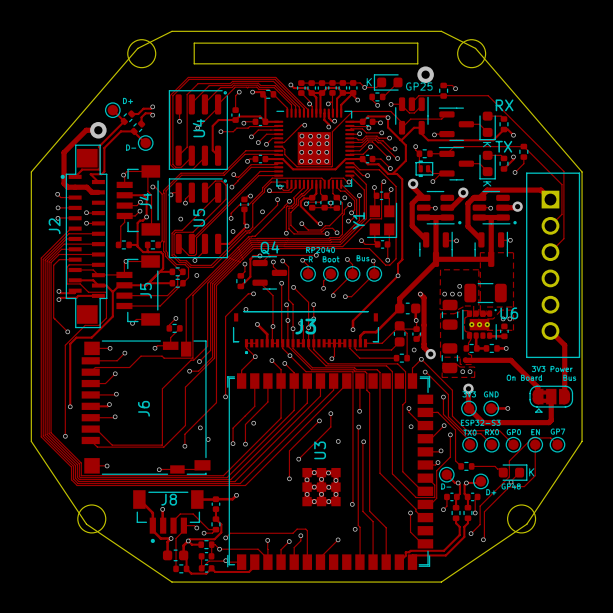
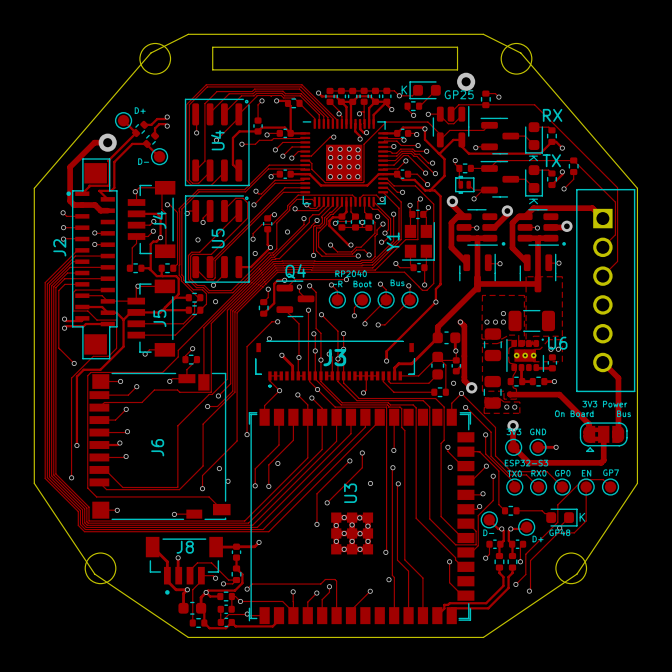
track: (202, 465) (198, 469) (177, 469) -> (221, 509) (209, 496) (96, 496) (87, 488) (87, 375) (90, 372) (162, 372) (178, 356) (178, 350) (271, 257) (274, 257) (309, 222) (309, 218) (312, 214) (319, 214) (328, 205) (328, 201)

